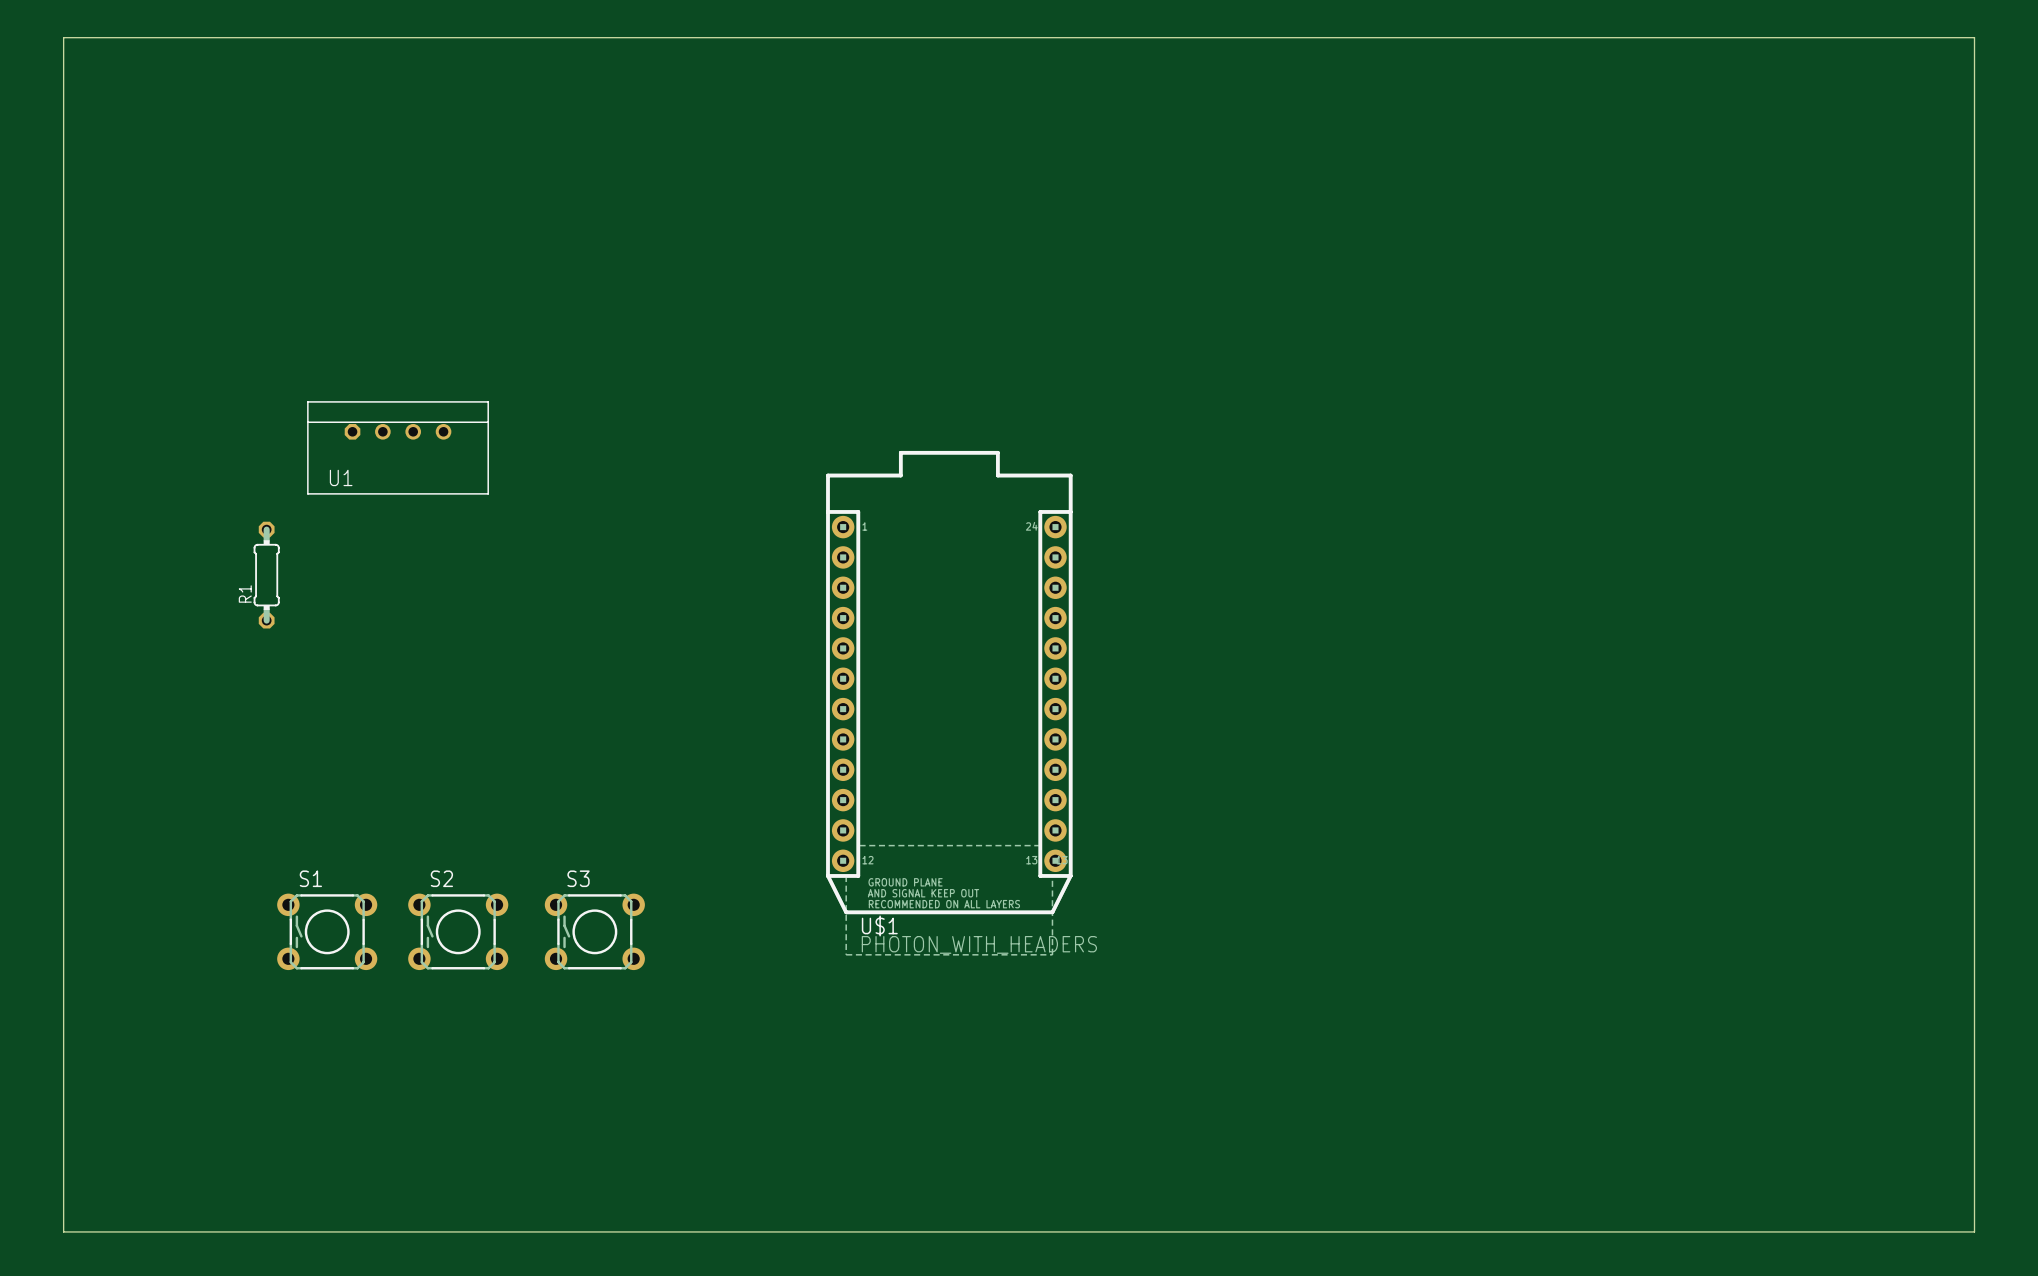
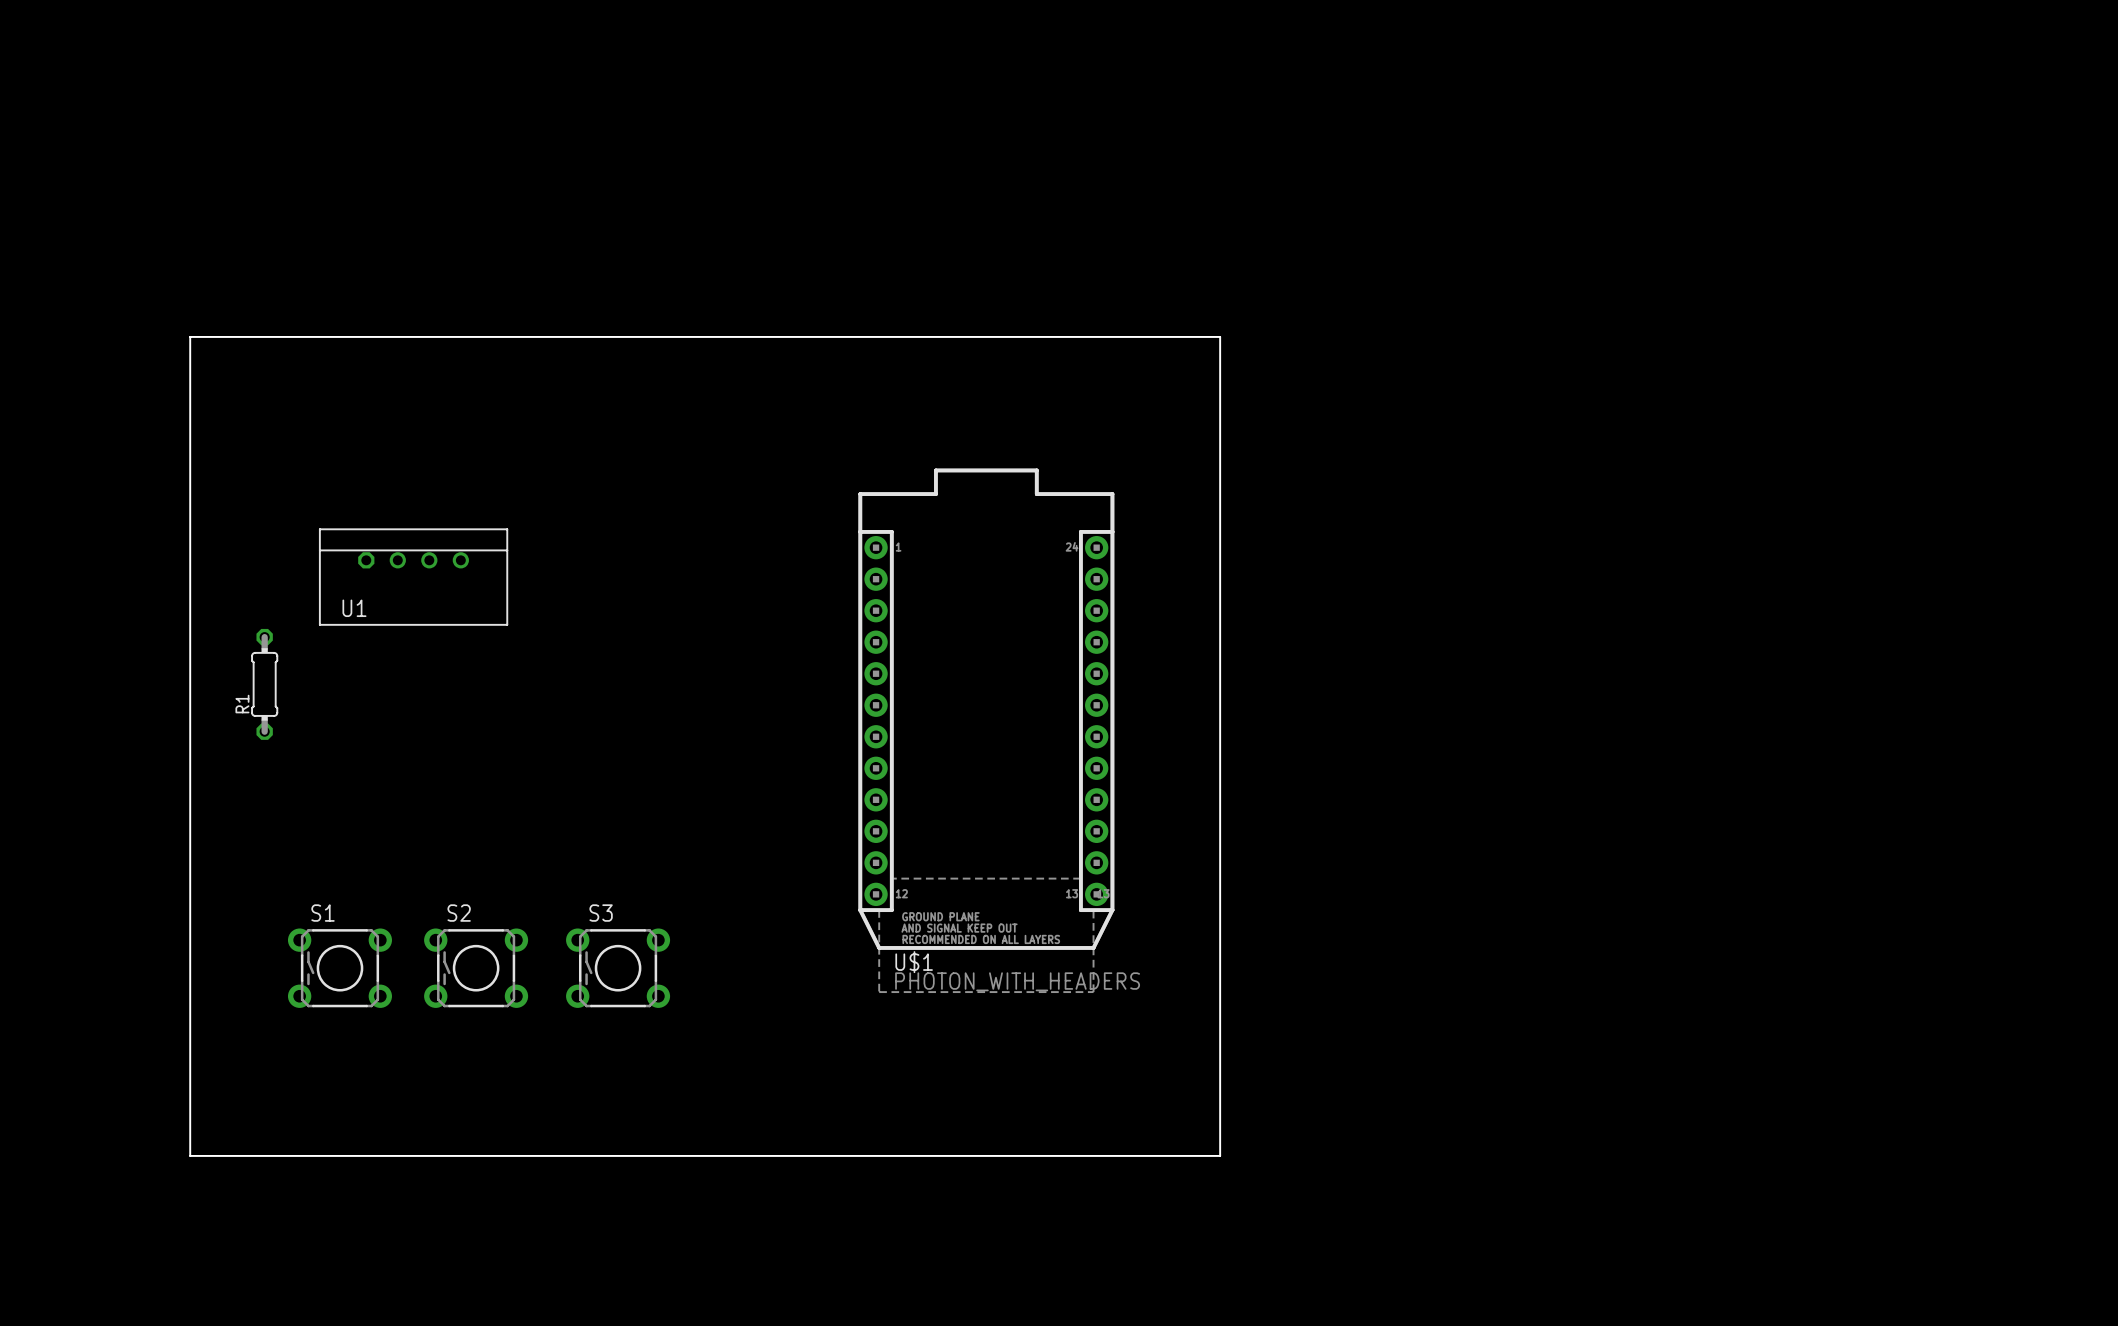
board edge: (63, 37) (1974, 37) (1974, 1231) (63, 1231) (63, 37) -> none
board edge: none -> (190, 336) (1220, 336) (1220, 1155) (190, 1155) (190, 336)
U1 position: (398, 447) -> (413, 577)
R1 position: (266, 575) -> (264, 684)

